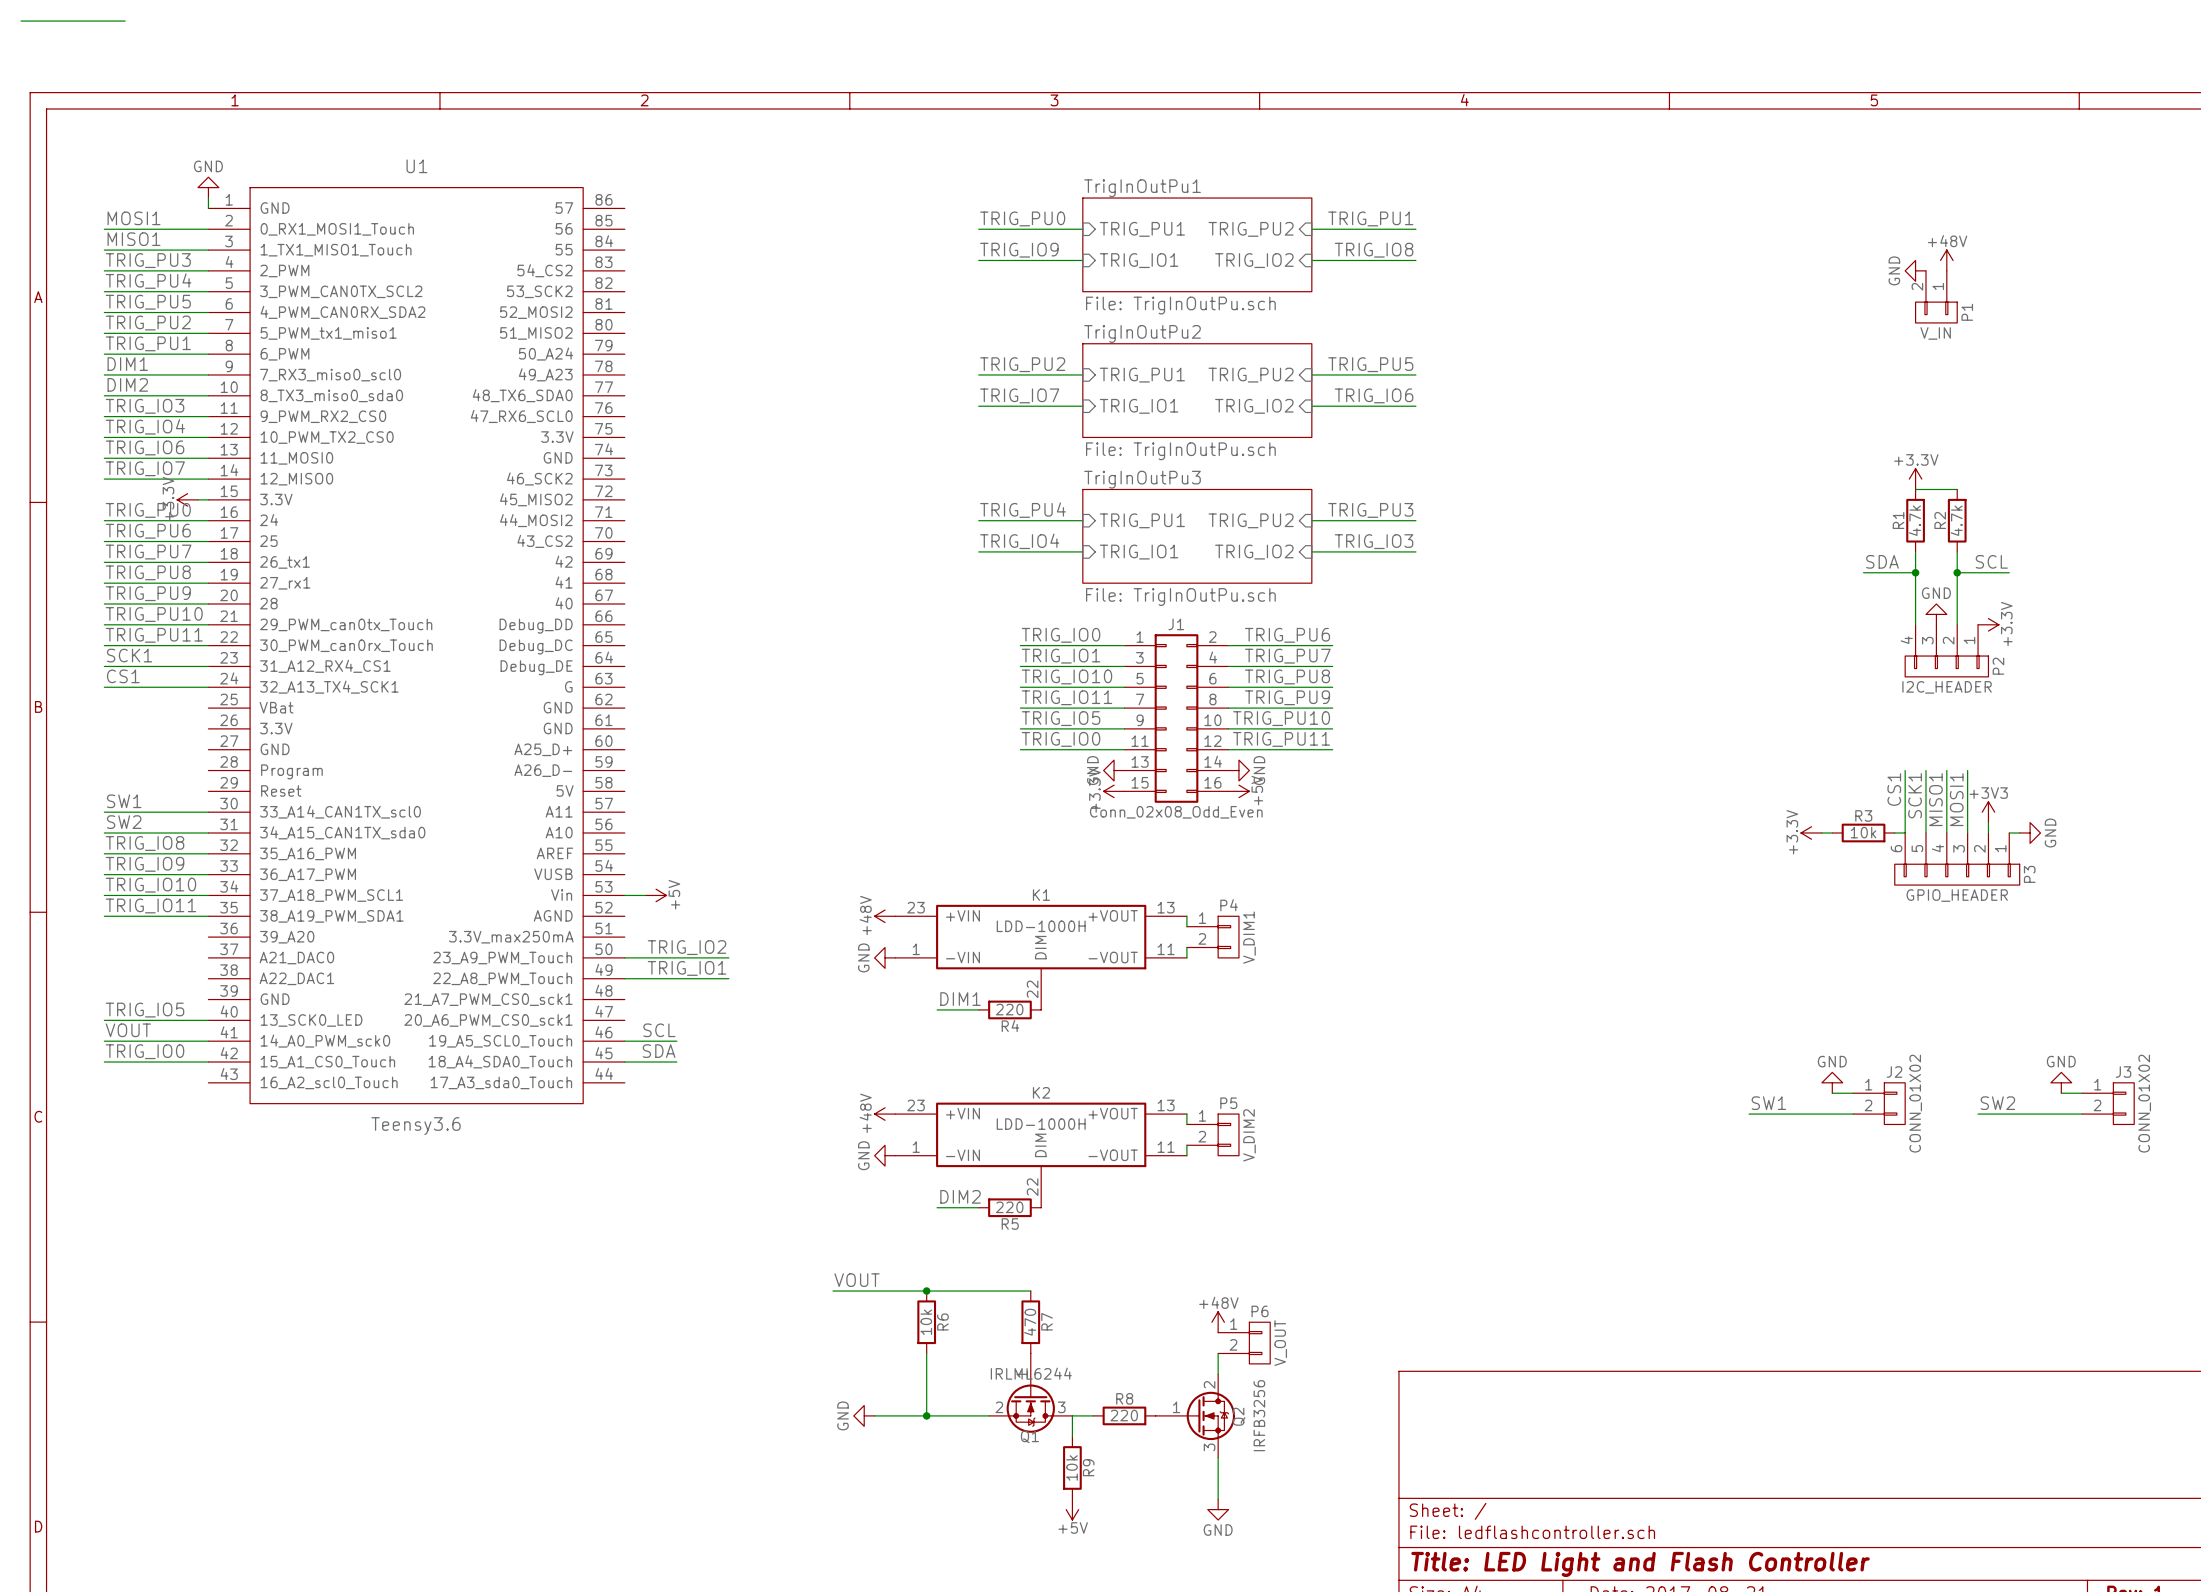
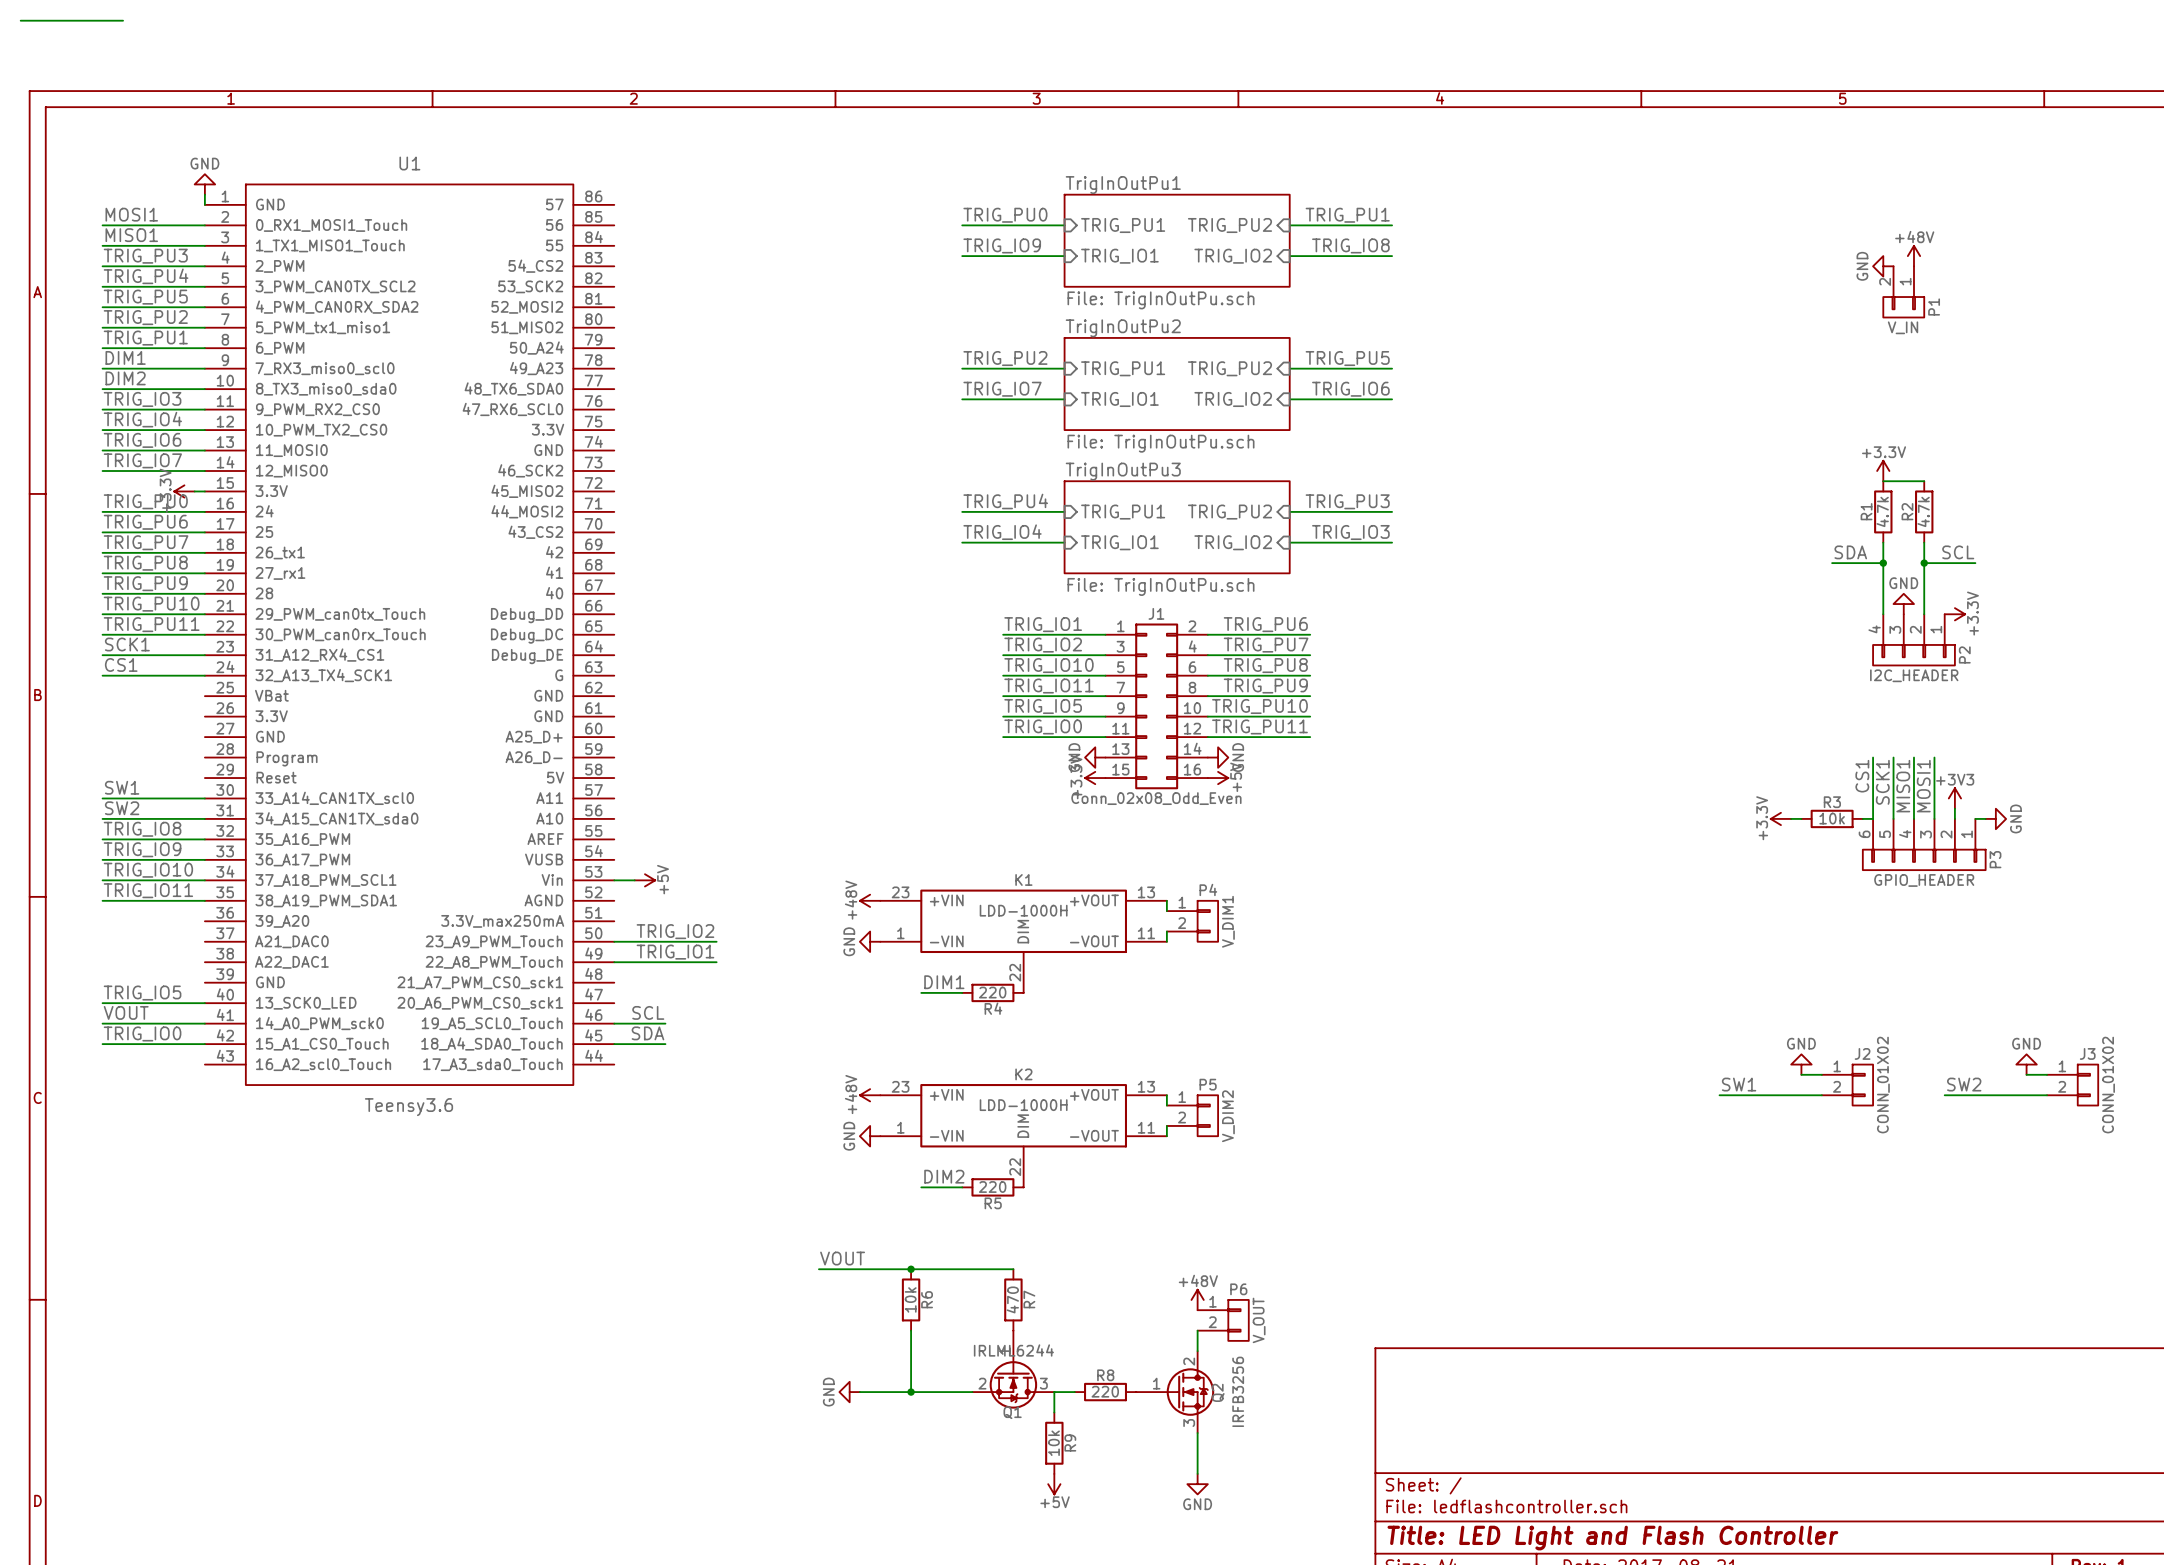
label: TRIG_IO0 (1061, 635) -> TRIG_IO1 (1043, 624)
label: TRIG_IO1 (1061, 656) -> TRIG_IO2 (1043, 645)

